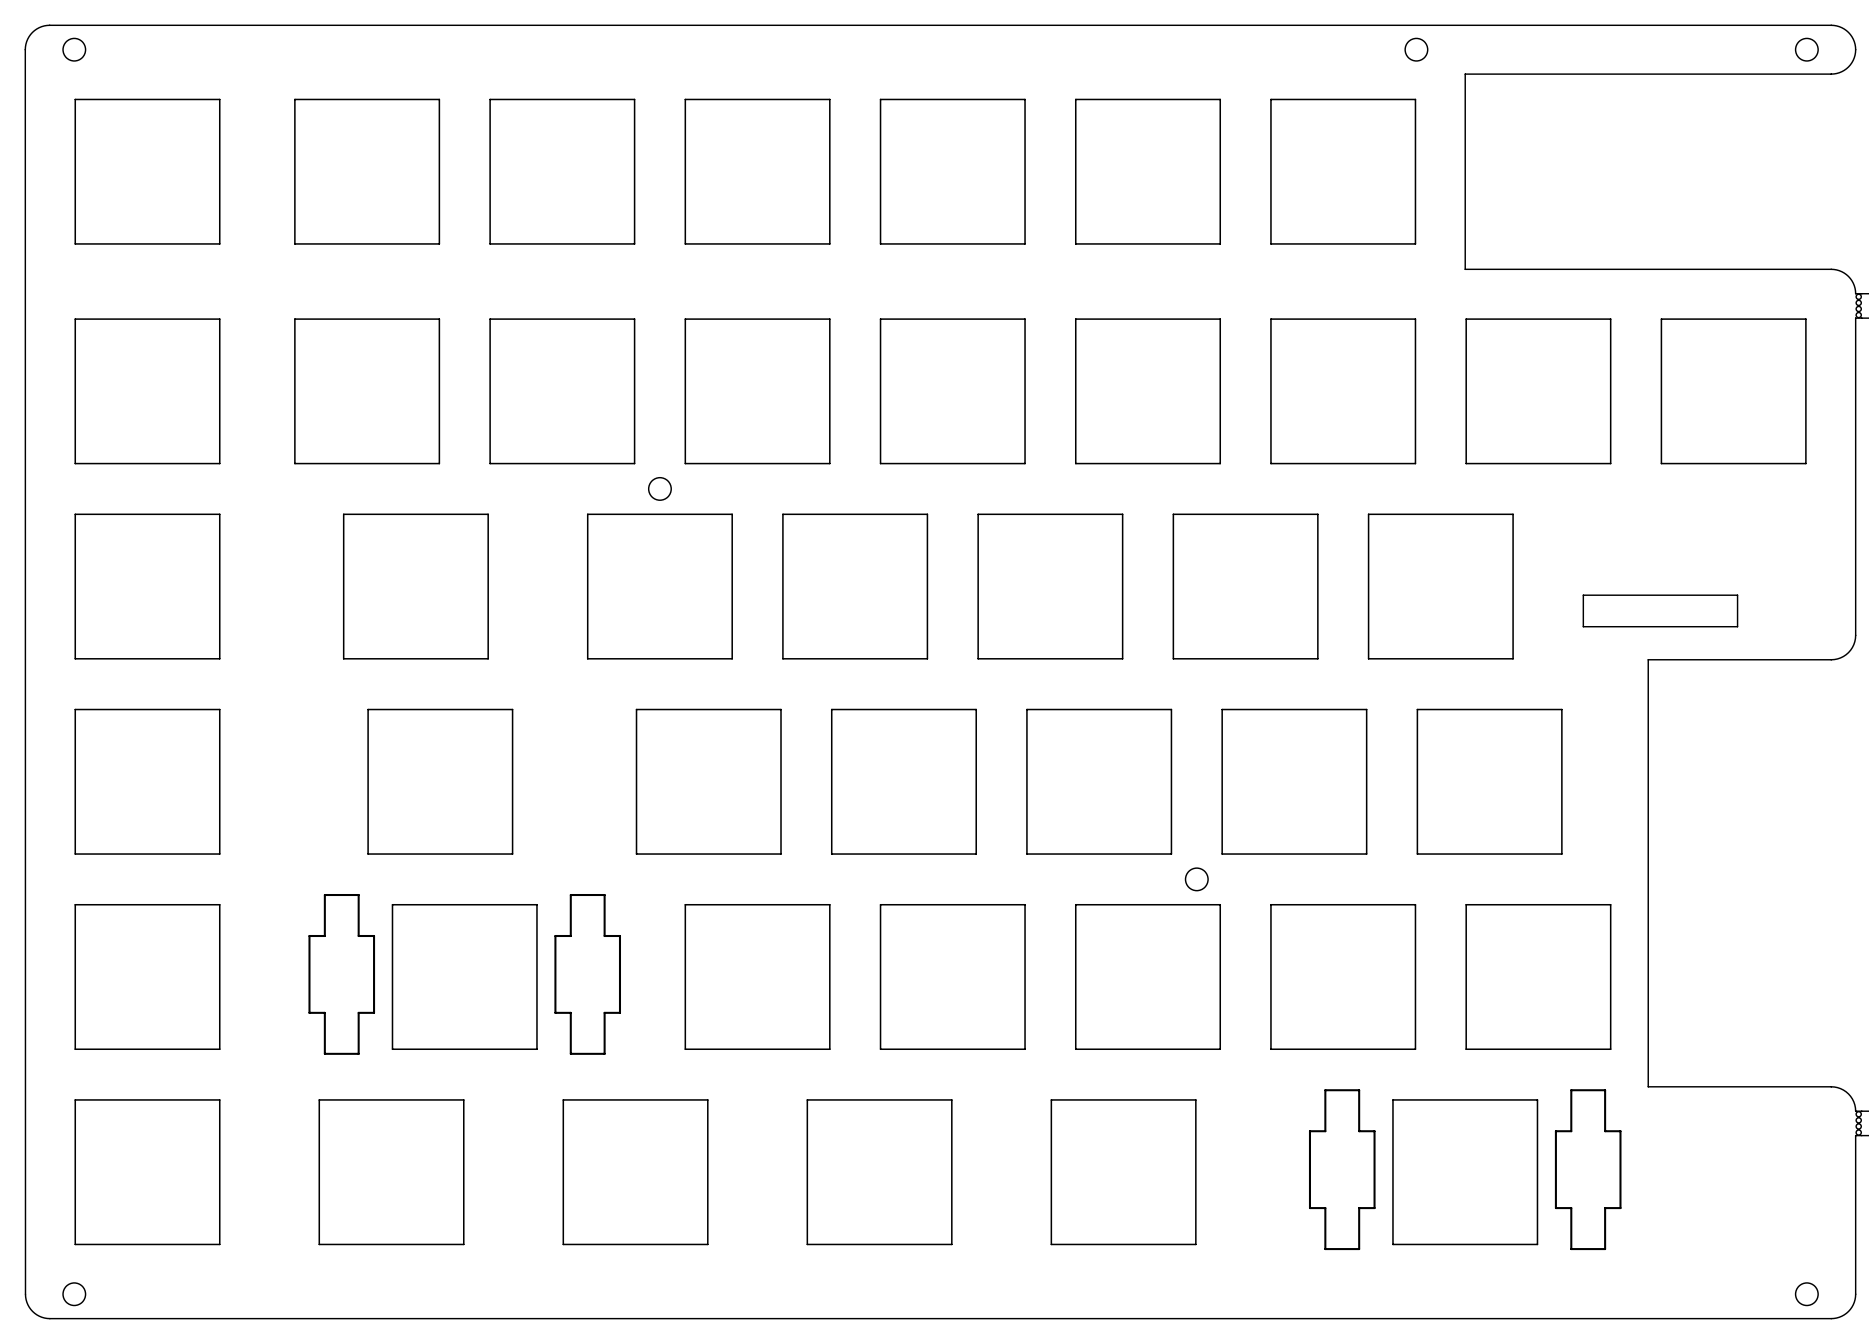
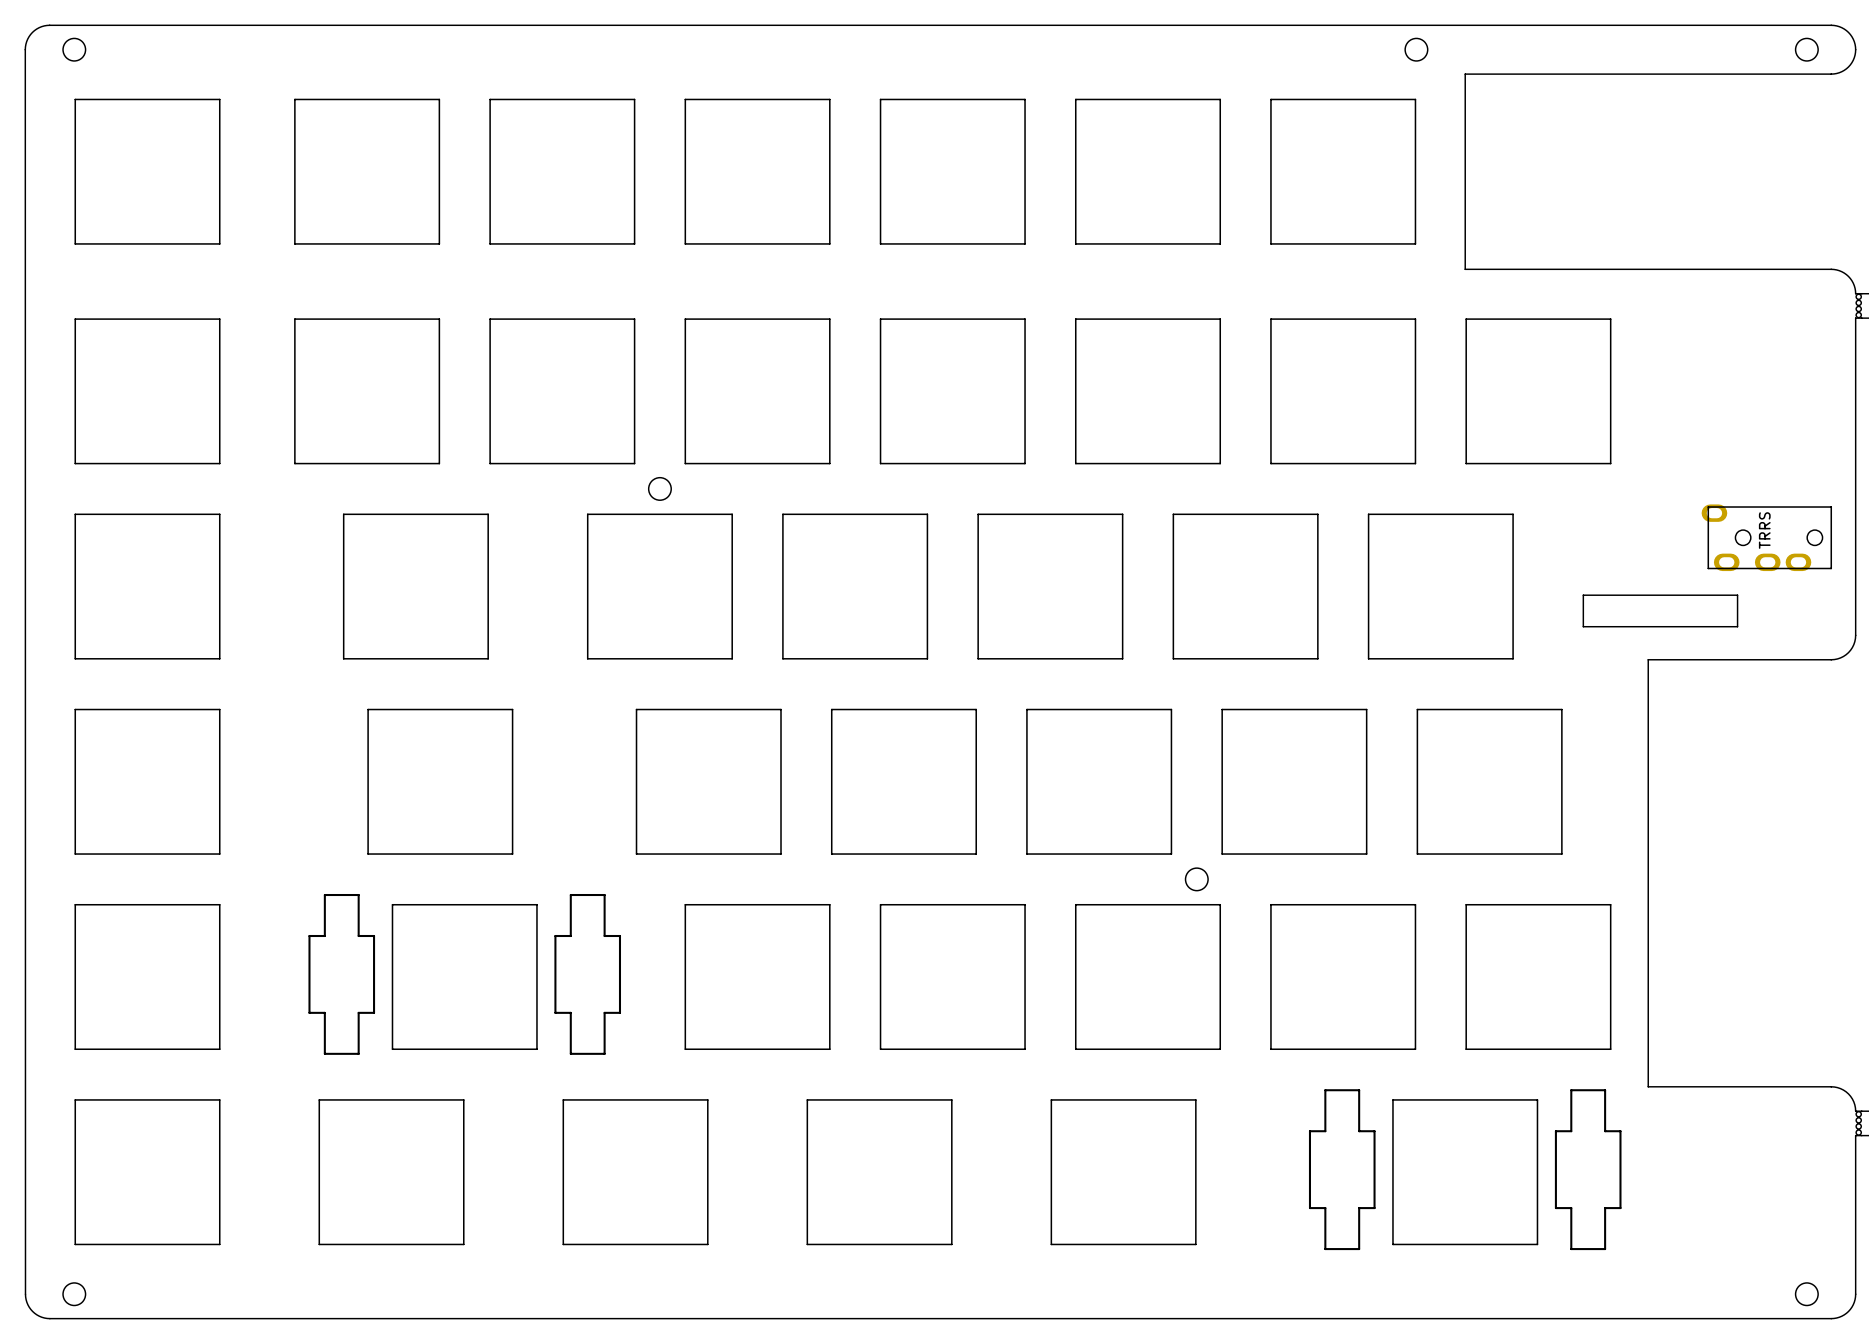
drawing: [1660, 318, 1807, 465] -> none
part: none -> (1766, 537)

